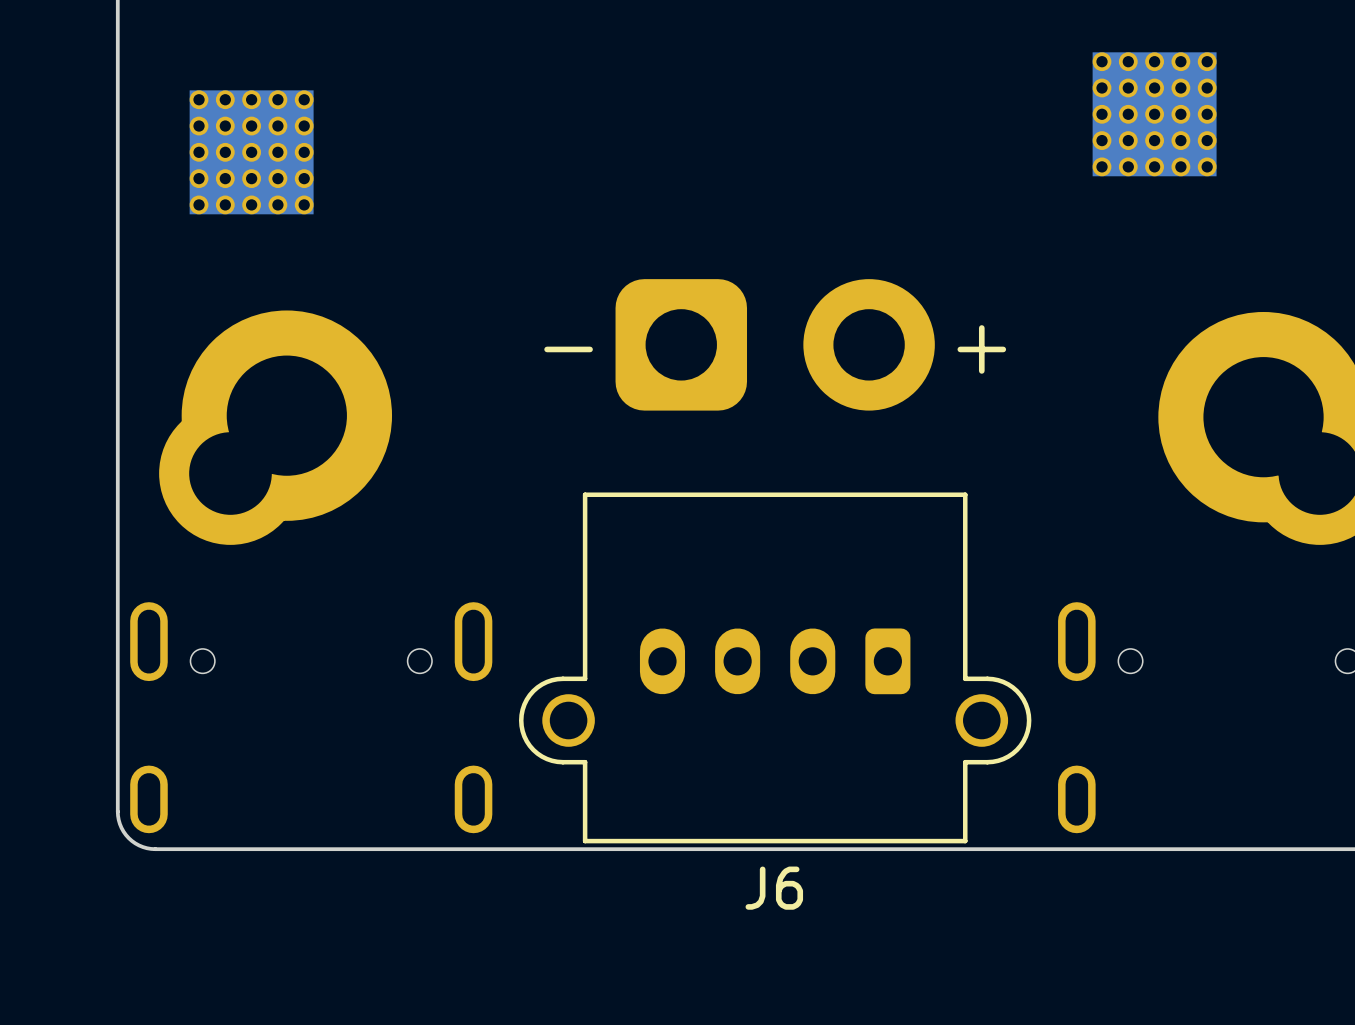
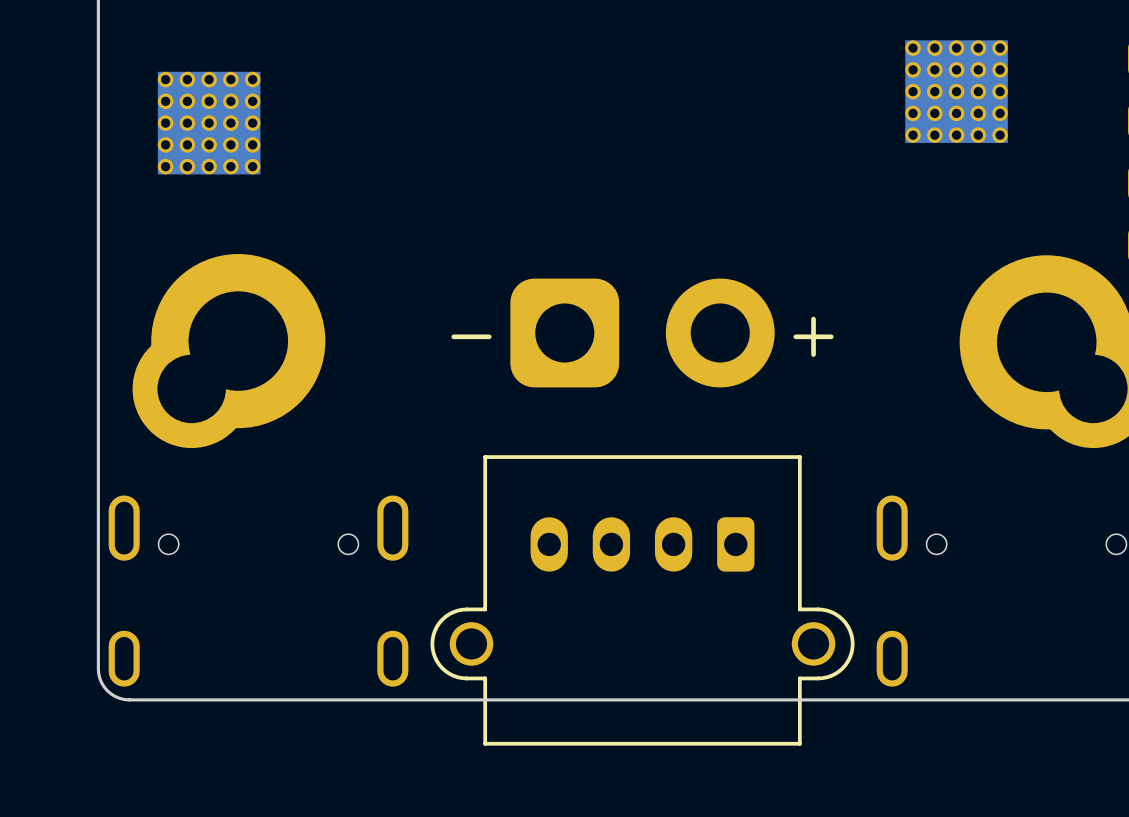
J6: (775, 561) -> none
part: none -> (642, 512)

